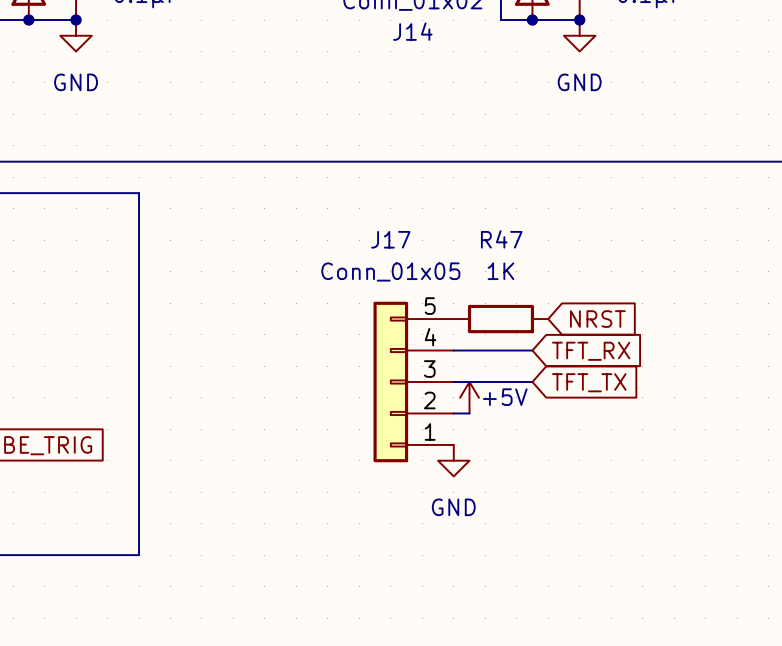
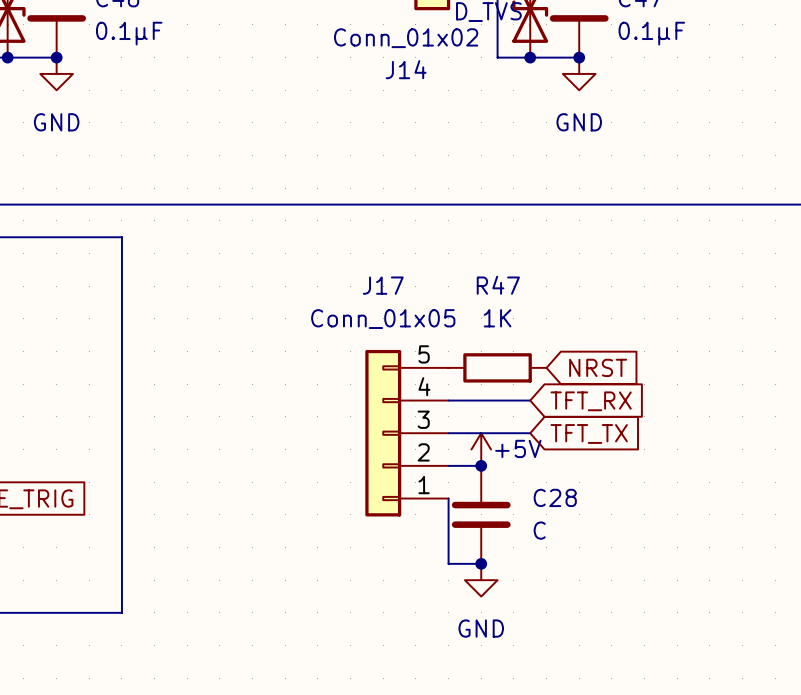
power symbol position: +5V (469, 397) -> +5V (481, 449)
wire: none -> (464, 465) (481, 465)
junction: none -> (481, 465)
wire: none -> (448, 498) (448, 563) (481, 563)
power symbol position: GND (453, 460) -> GND (481, 580)
C28: none -> C (481, 514)
junction: none -> (481, 563)

